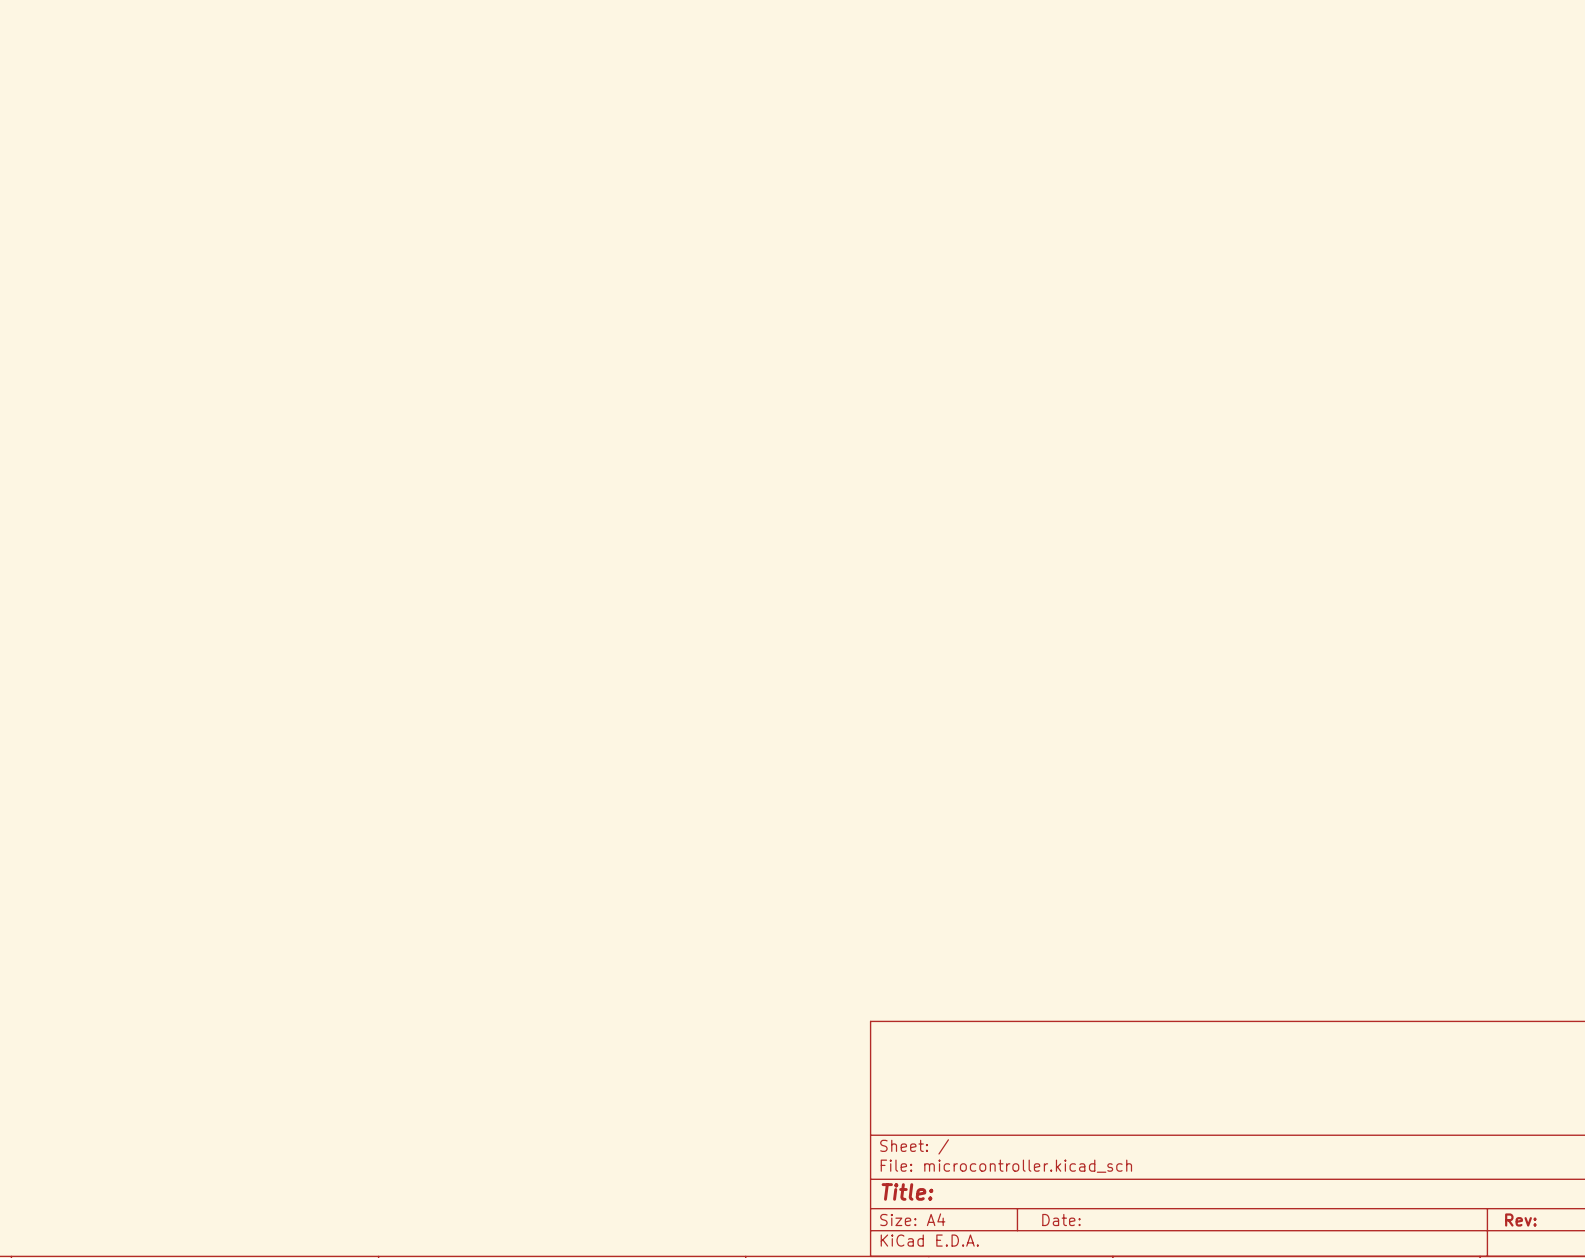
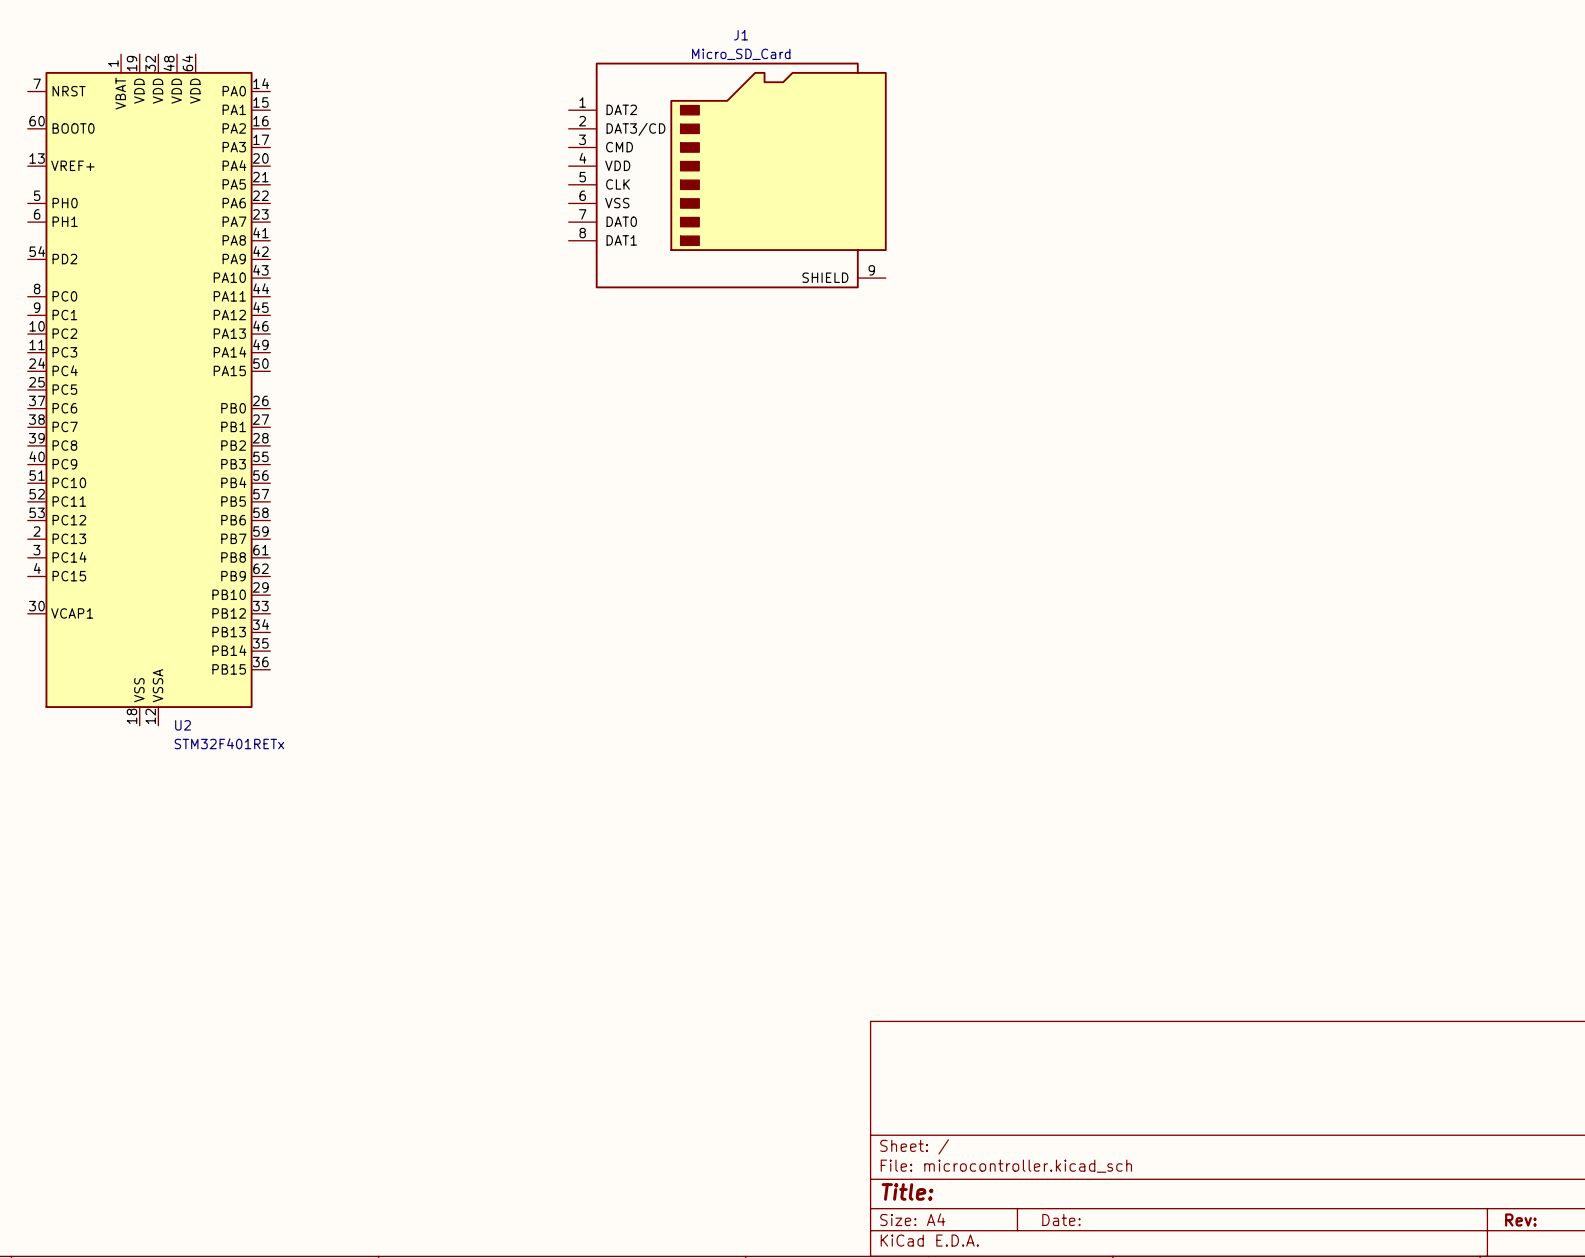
J1: none -> Micro_SD_Card (727, 175)
U2: none -> STM32F401RETx (149, 389)

